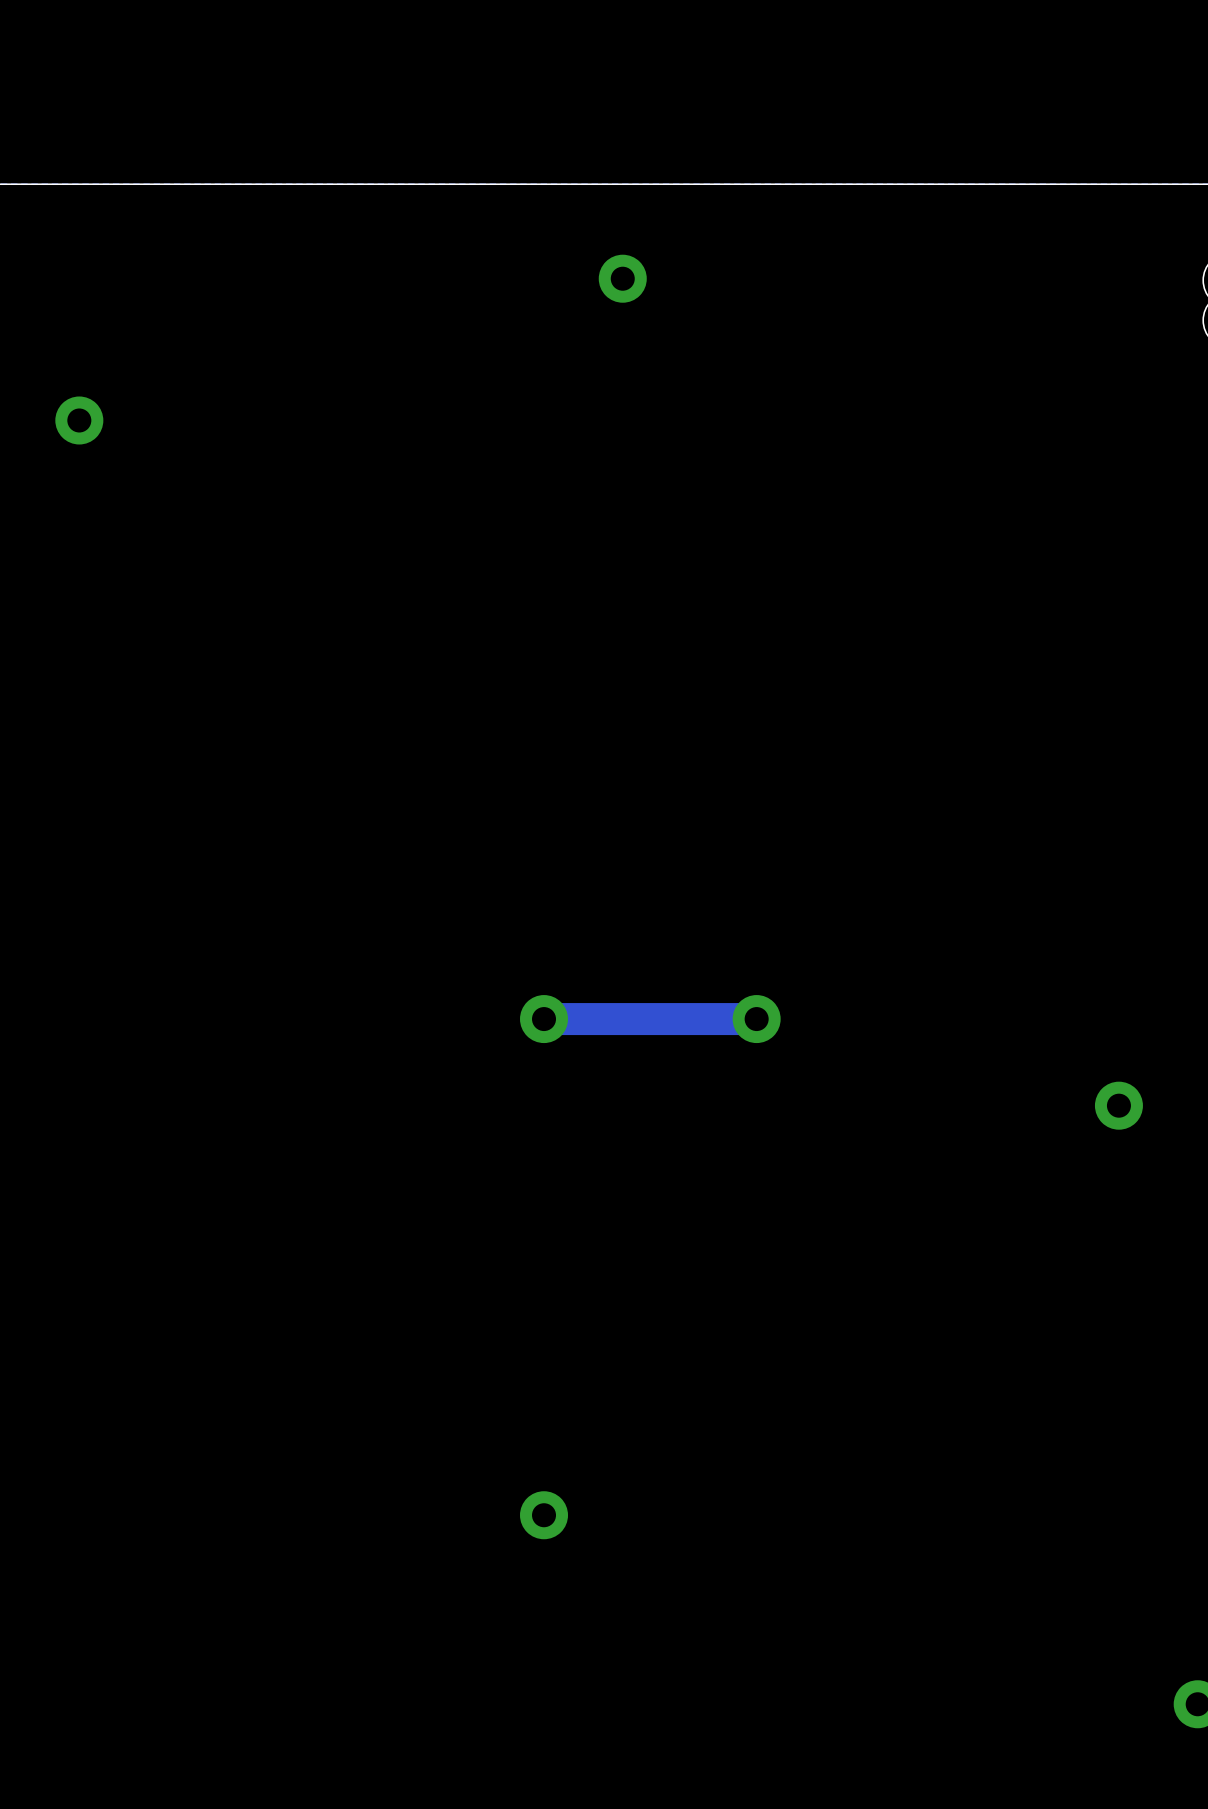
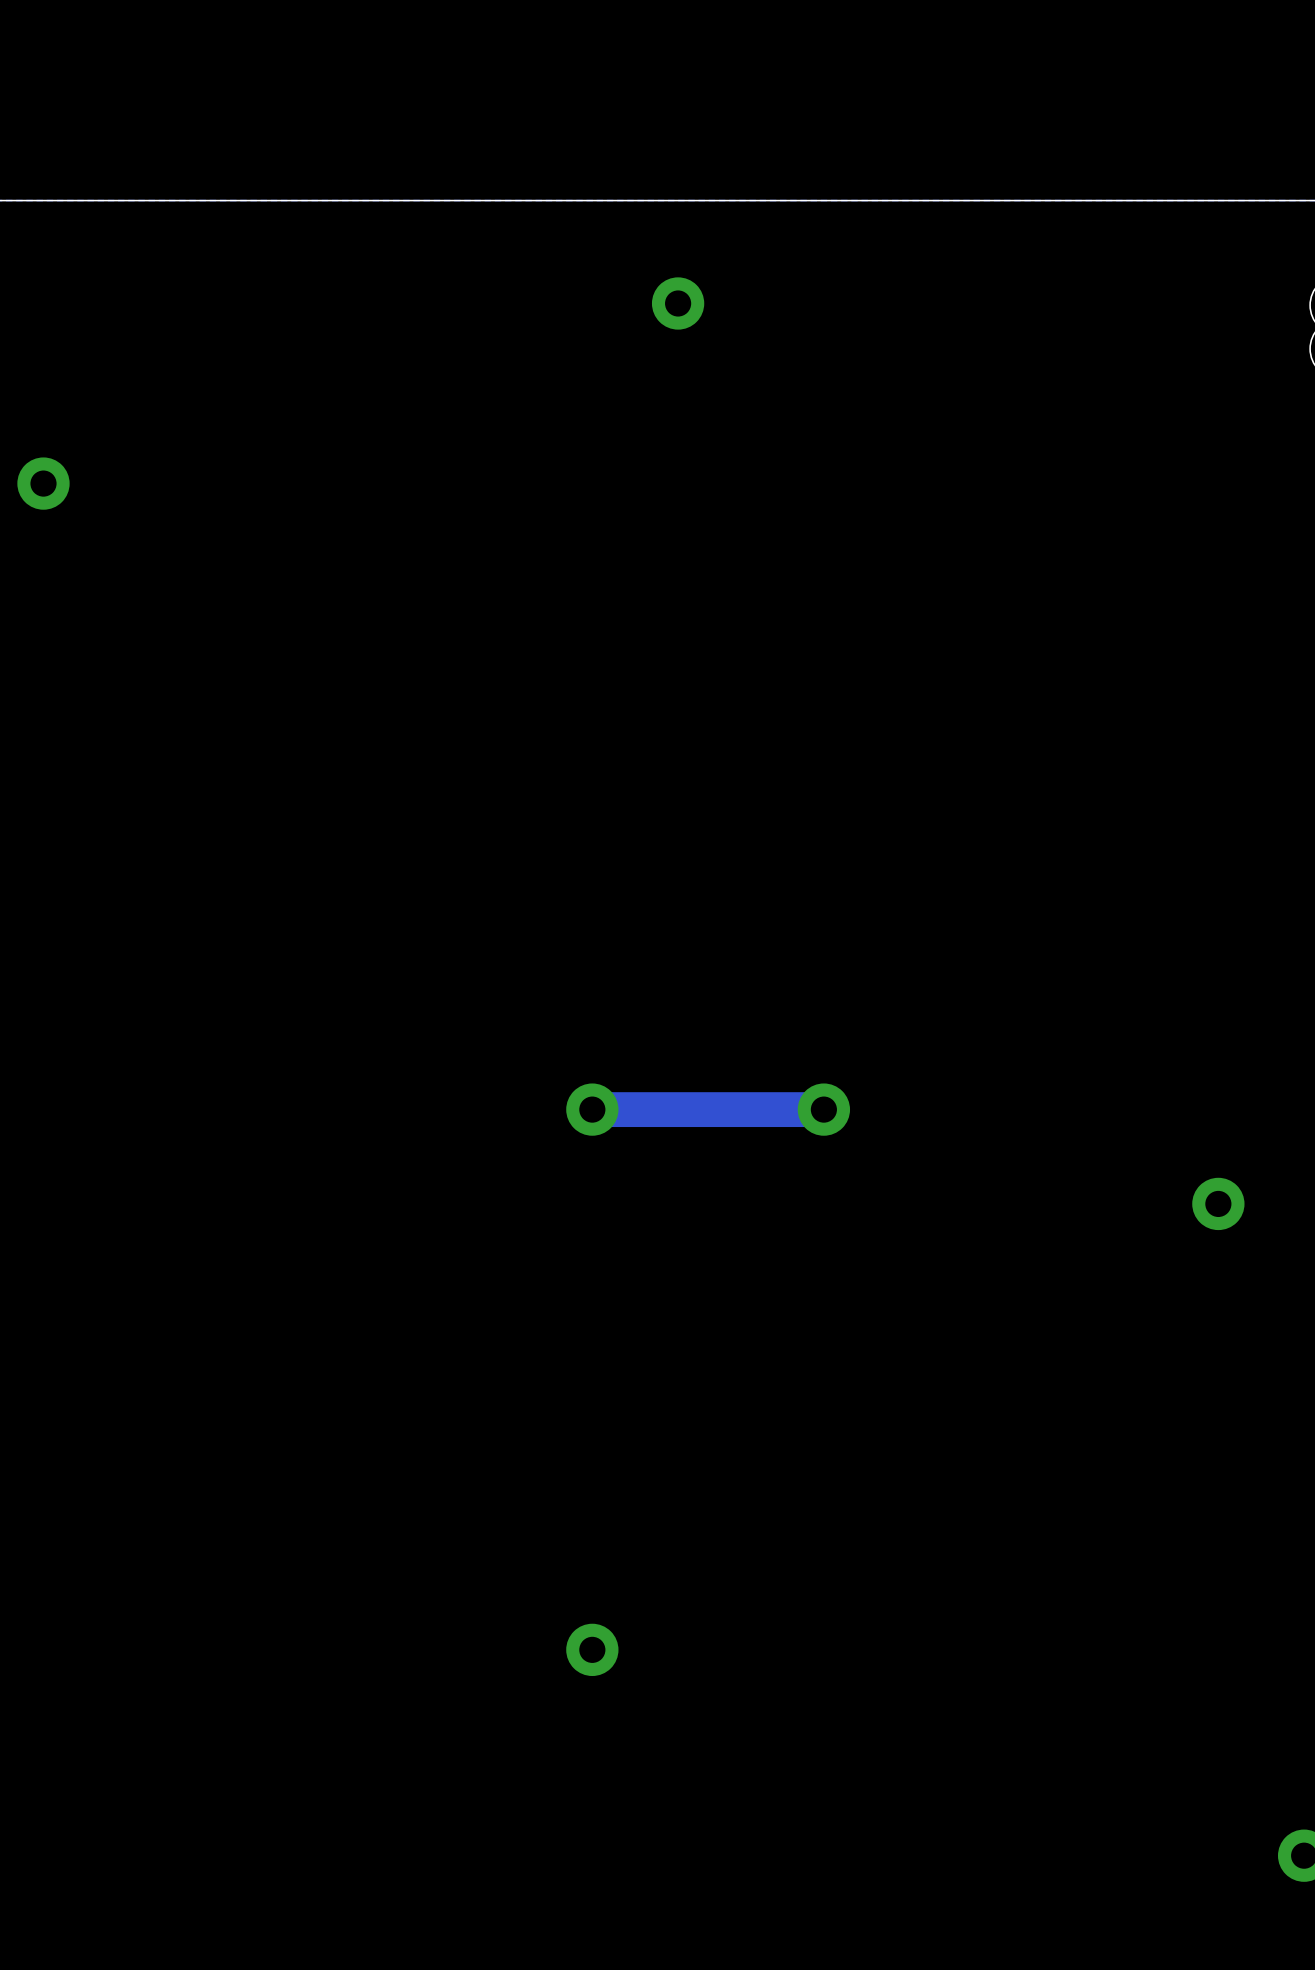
via position: (79, 420) -> (43, 483)

